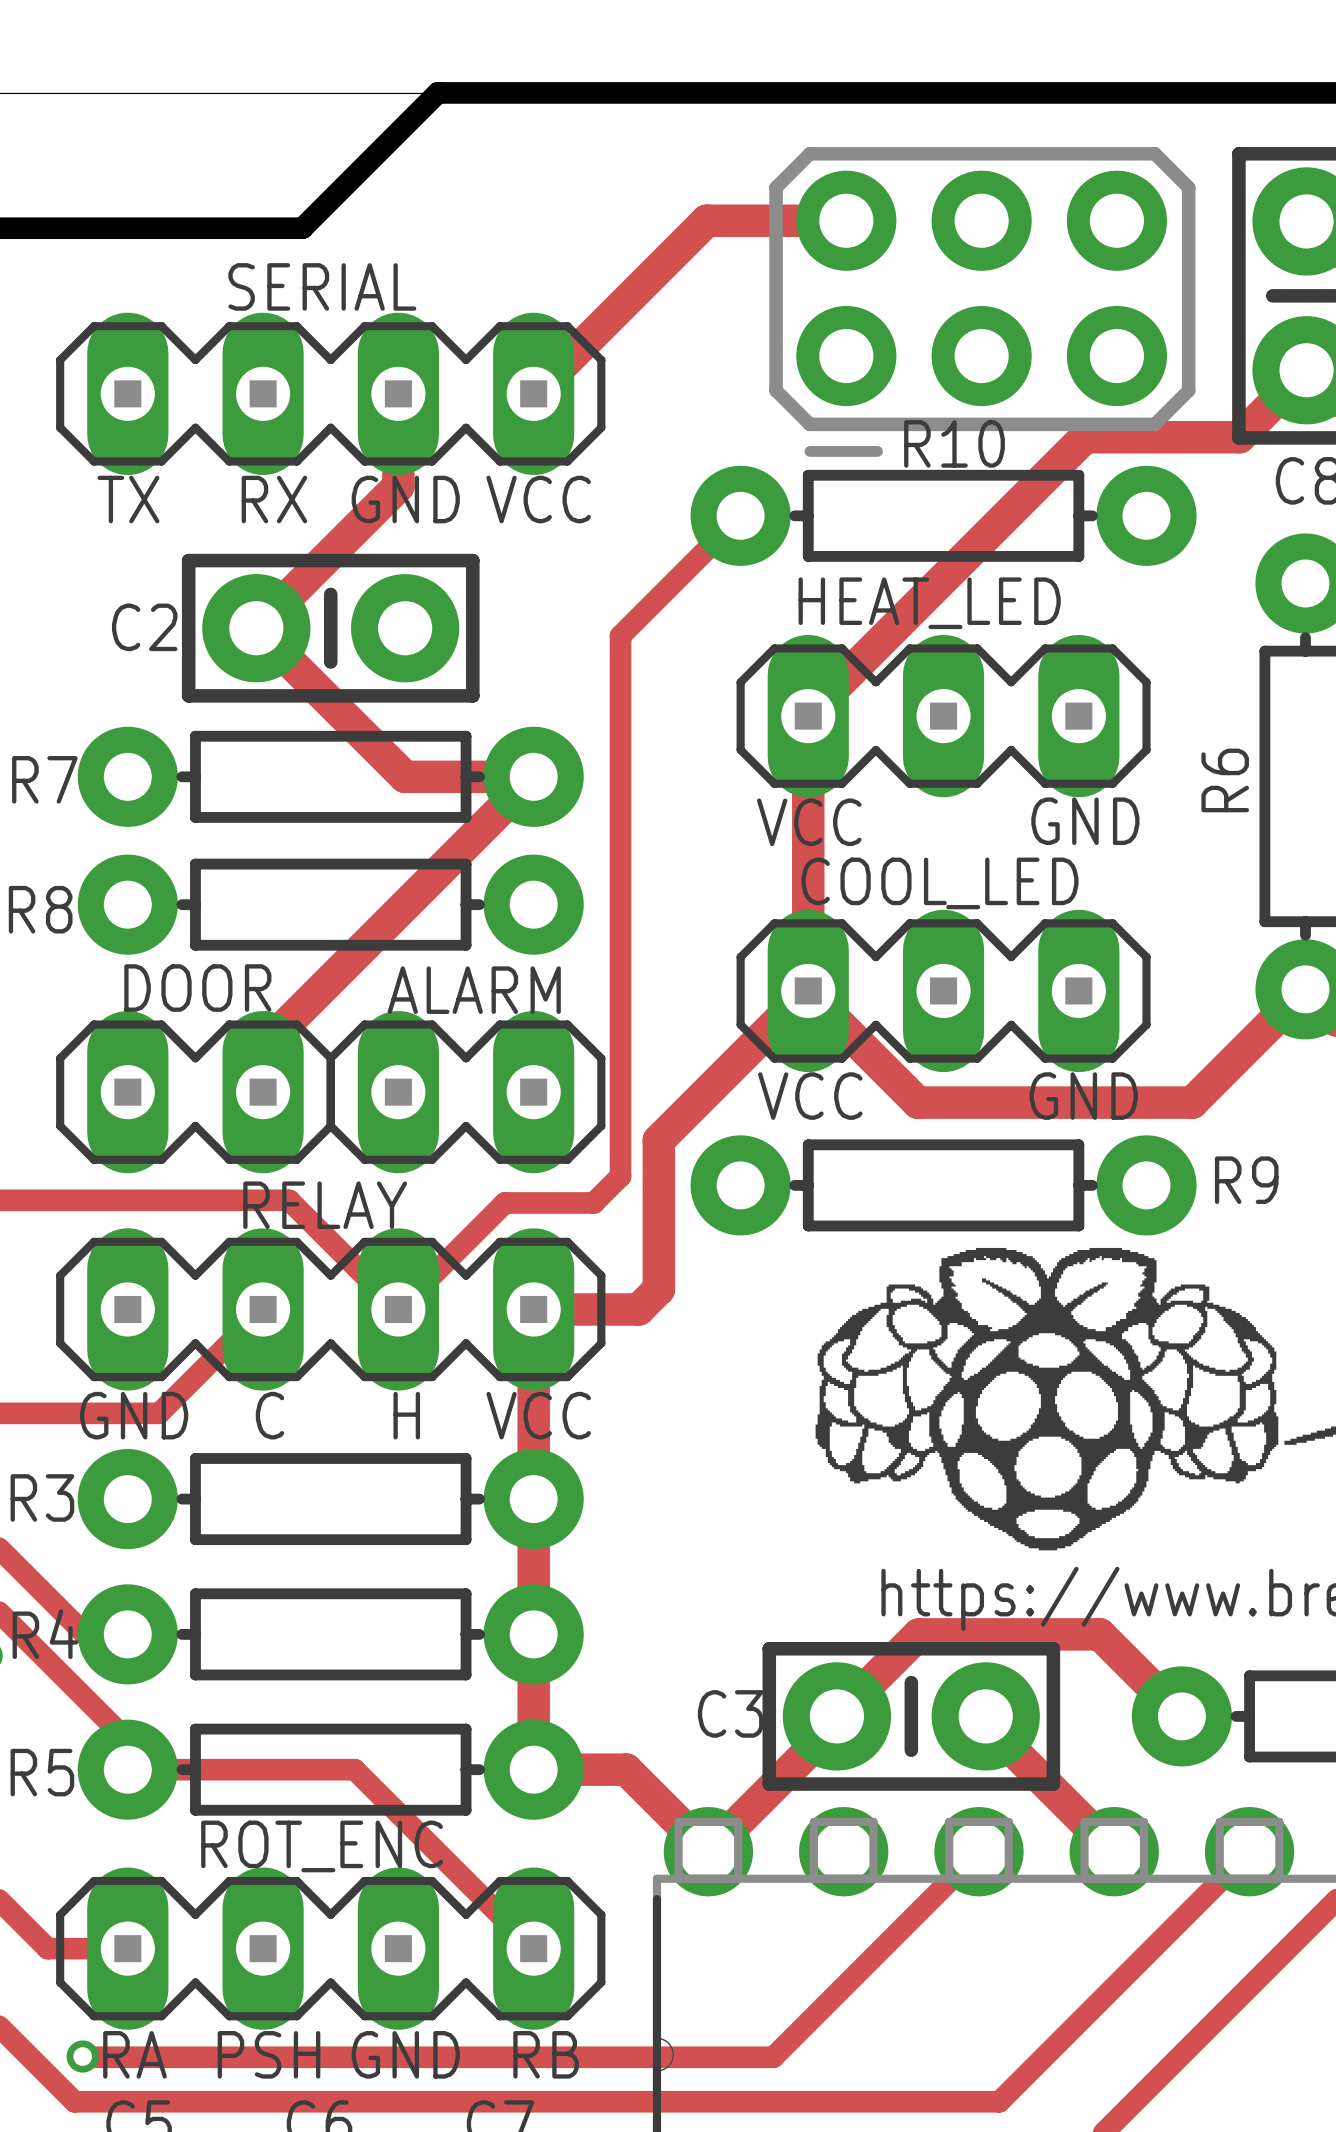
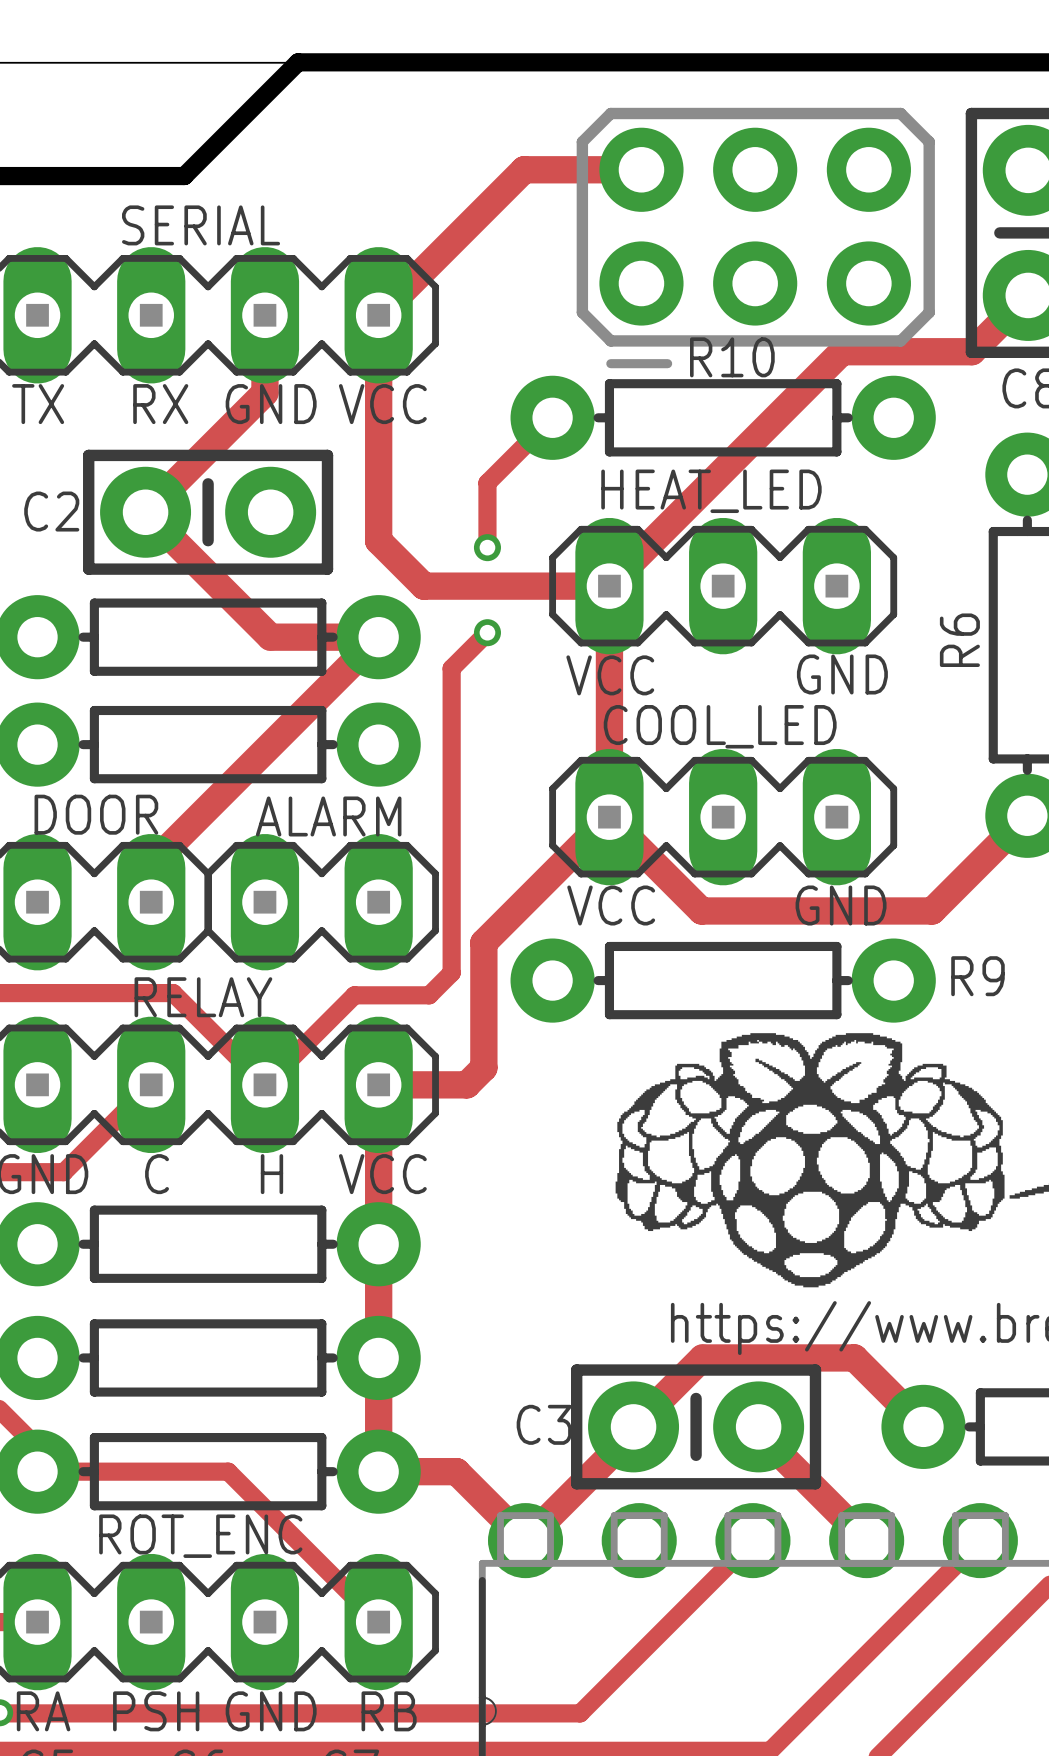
track: none -> (378, 315) (378, 540) (423, 586) (609, 586)
track: (663, 593) (620, 635) (620, 814) -> (487, 482) (487, 547)
via: none -> (487, 547)
track: none -> (487, 632) (451, 668)
via: none -> (487, 632)

